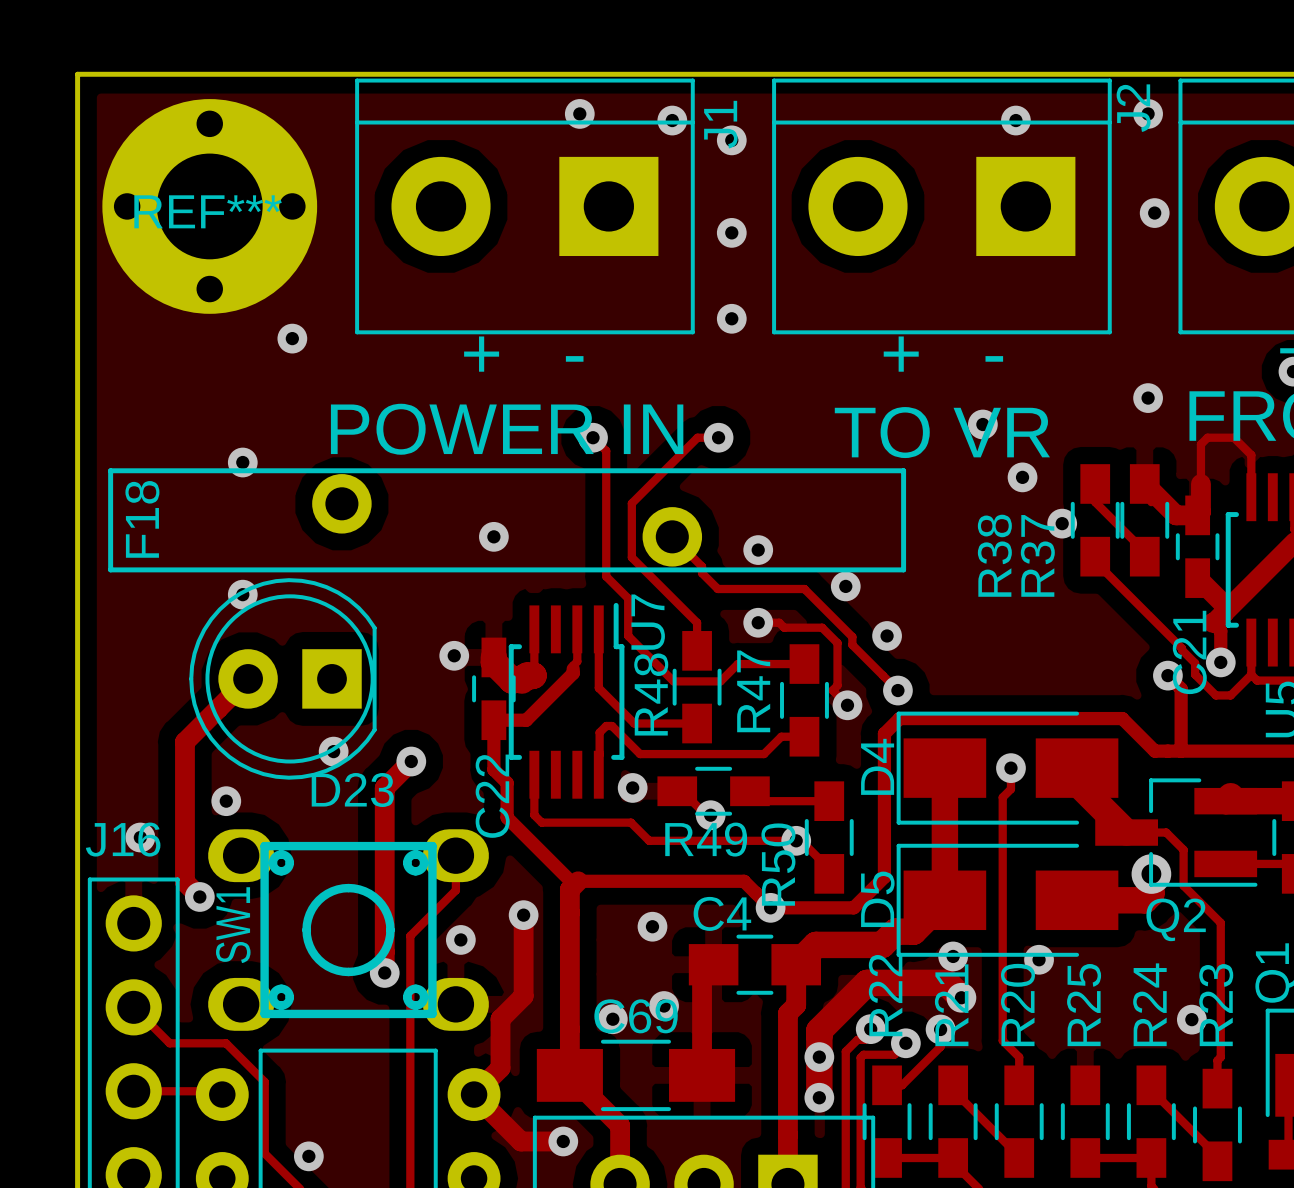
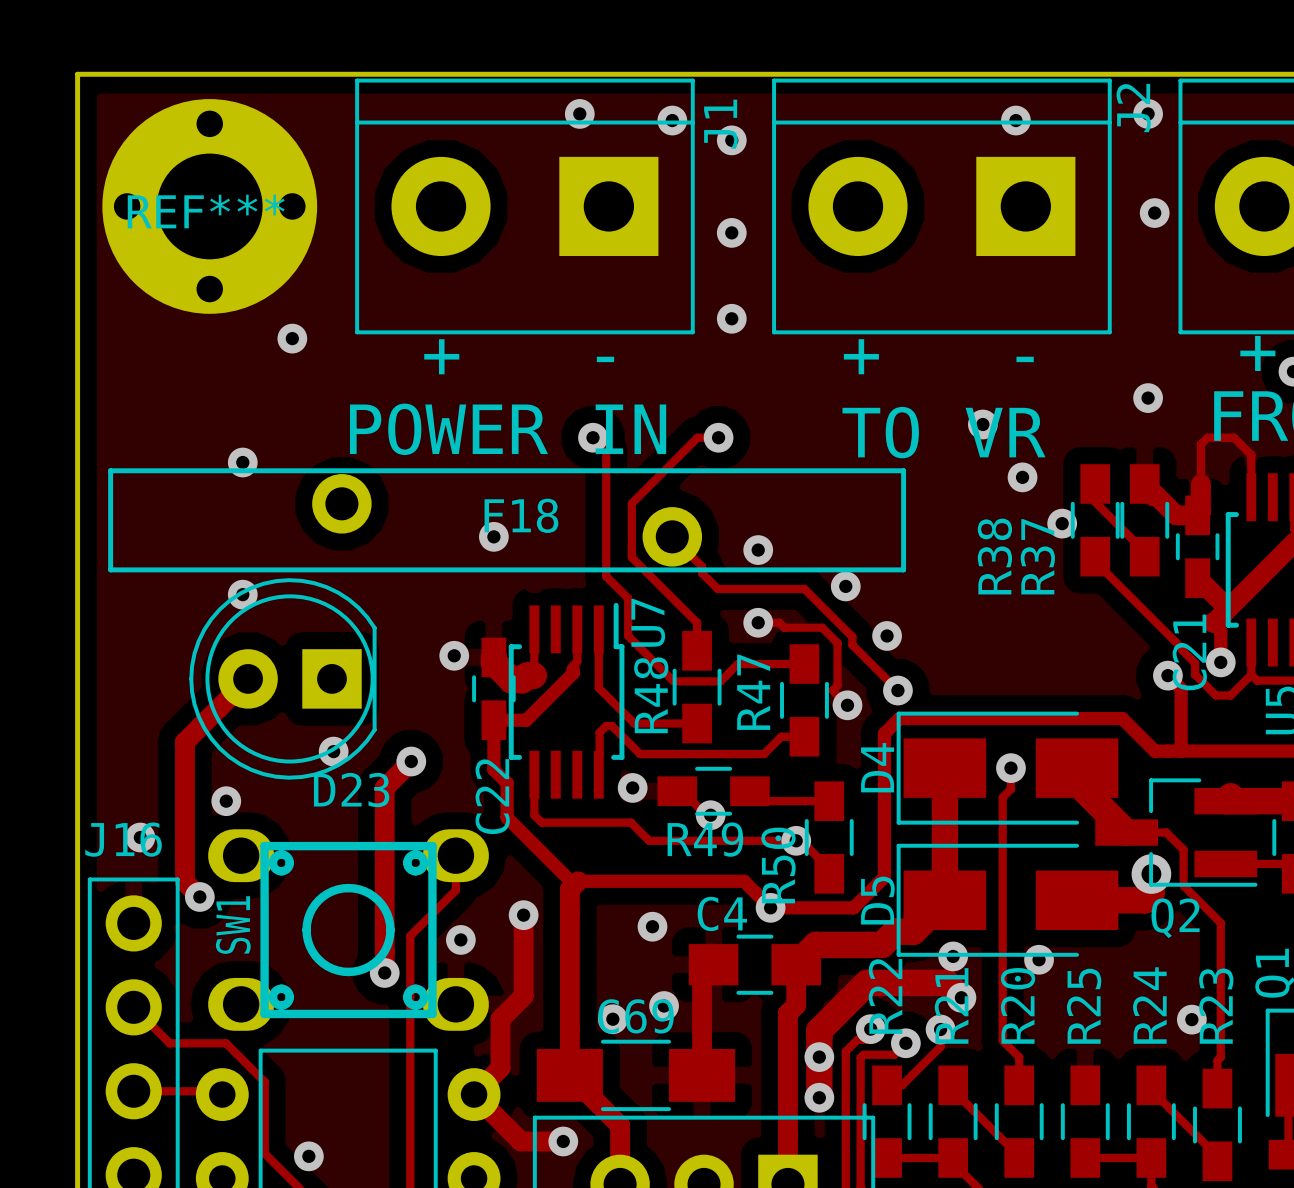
F18 name rotation: 0° (142, 519) -> 90° clockwise (521, 515)
F18 name position: F18 (142, 519) -> F18 (521, 515)

